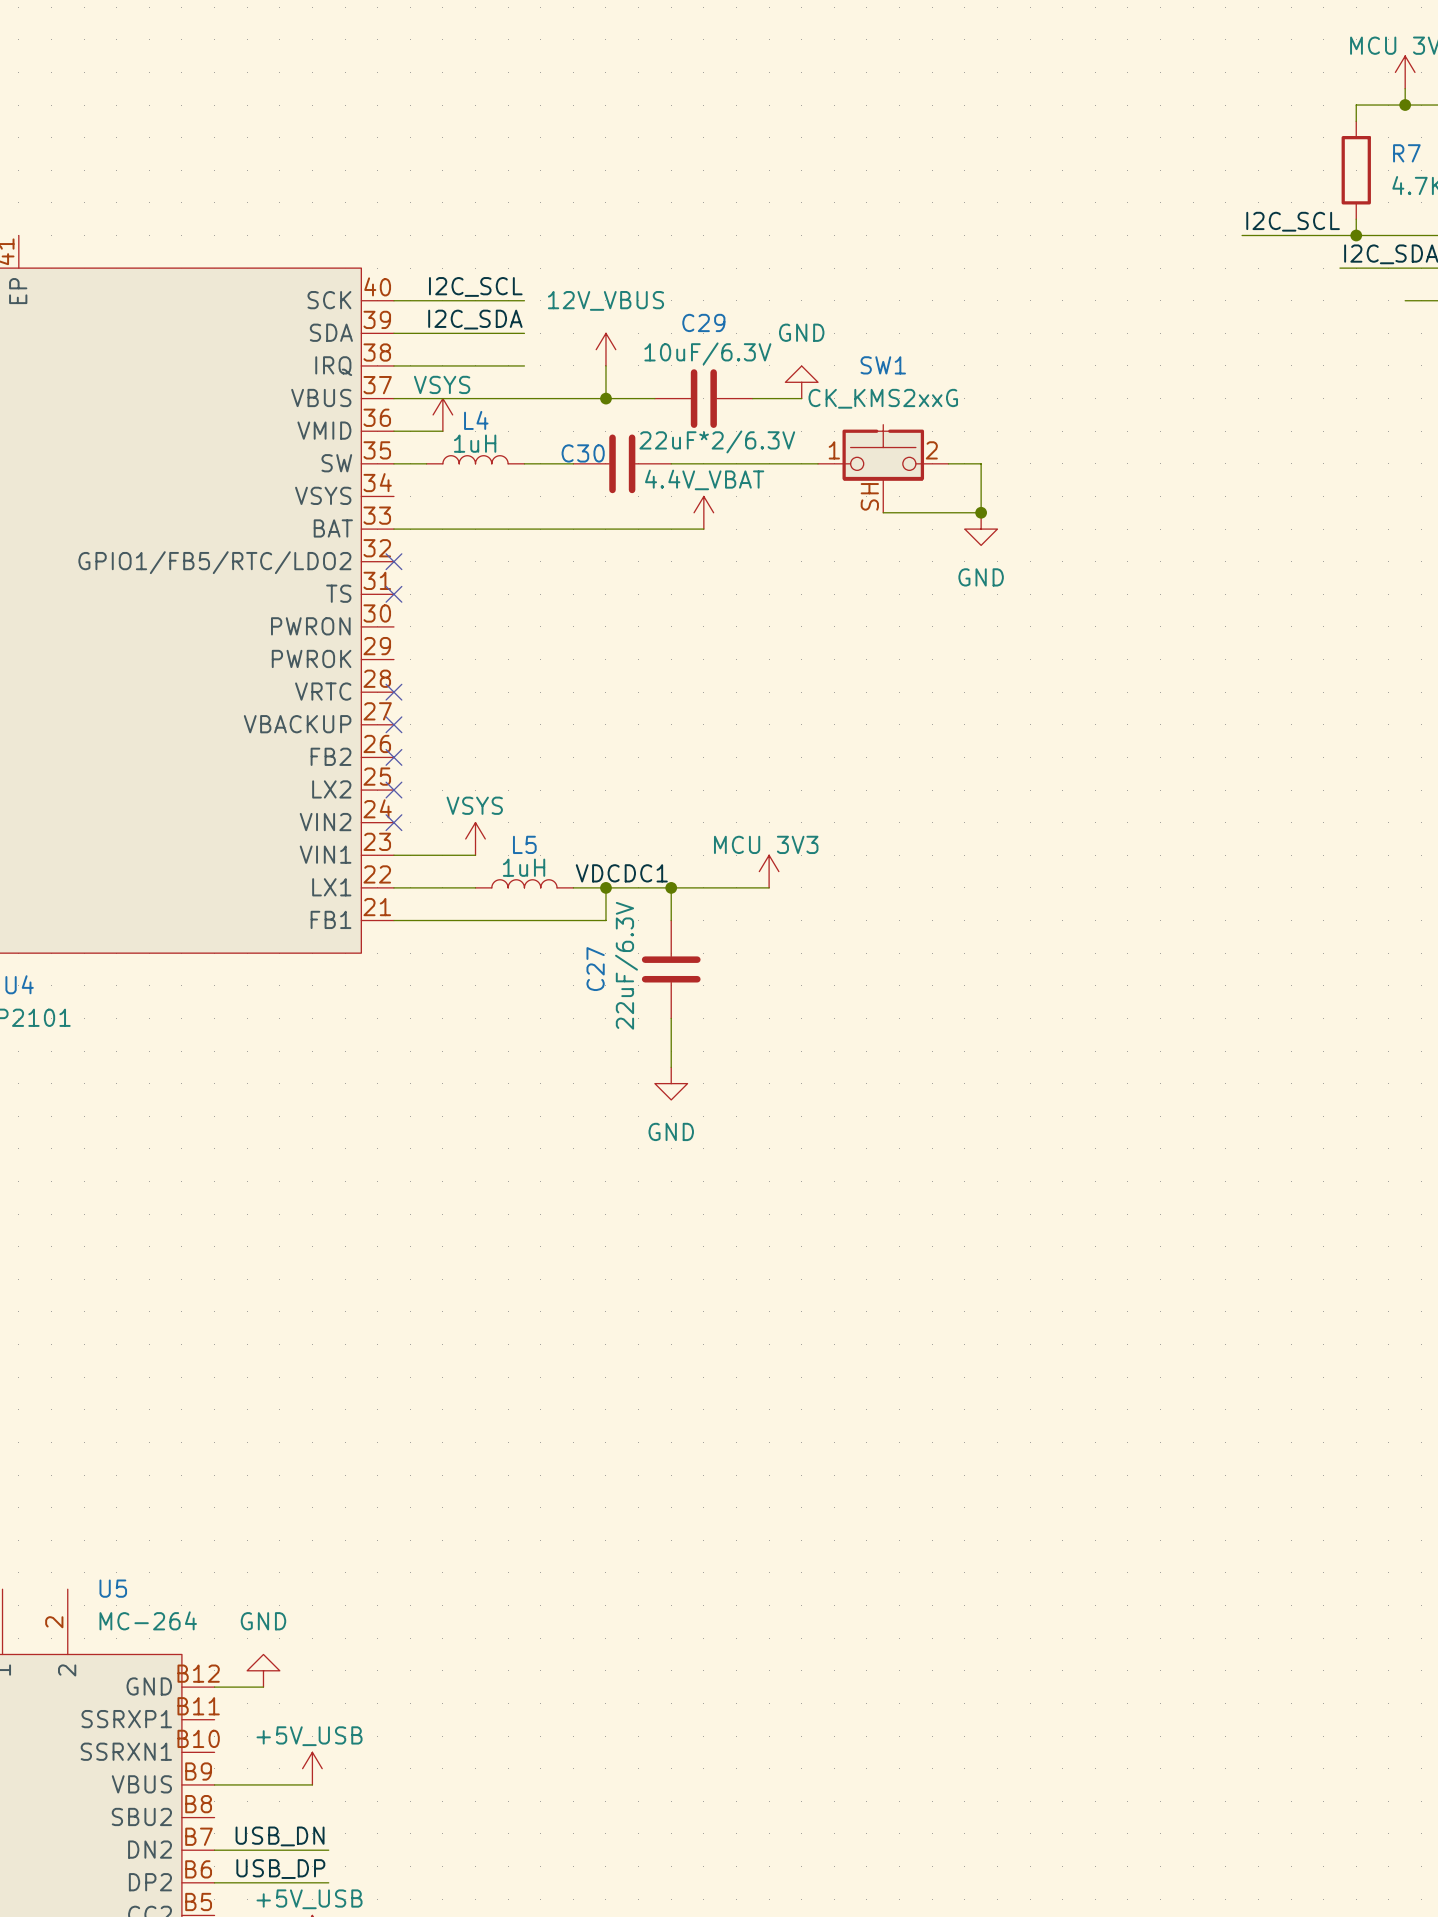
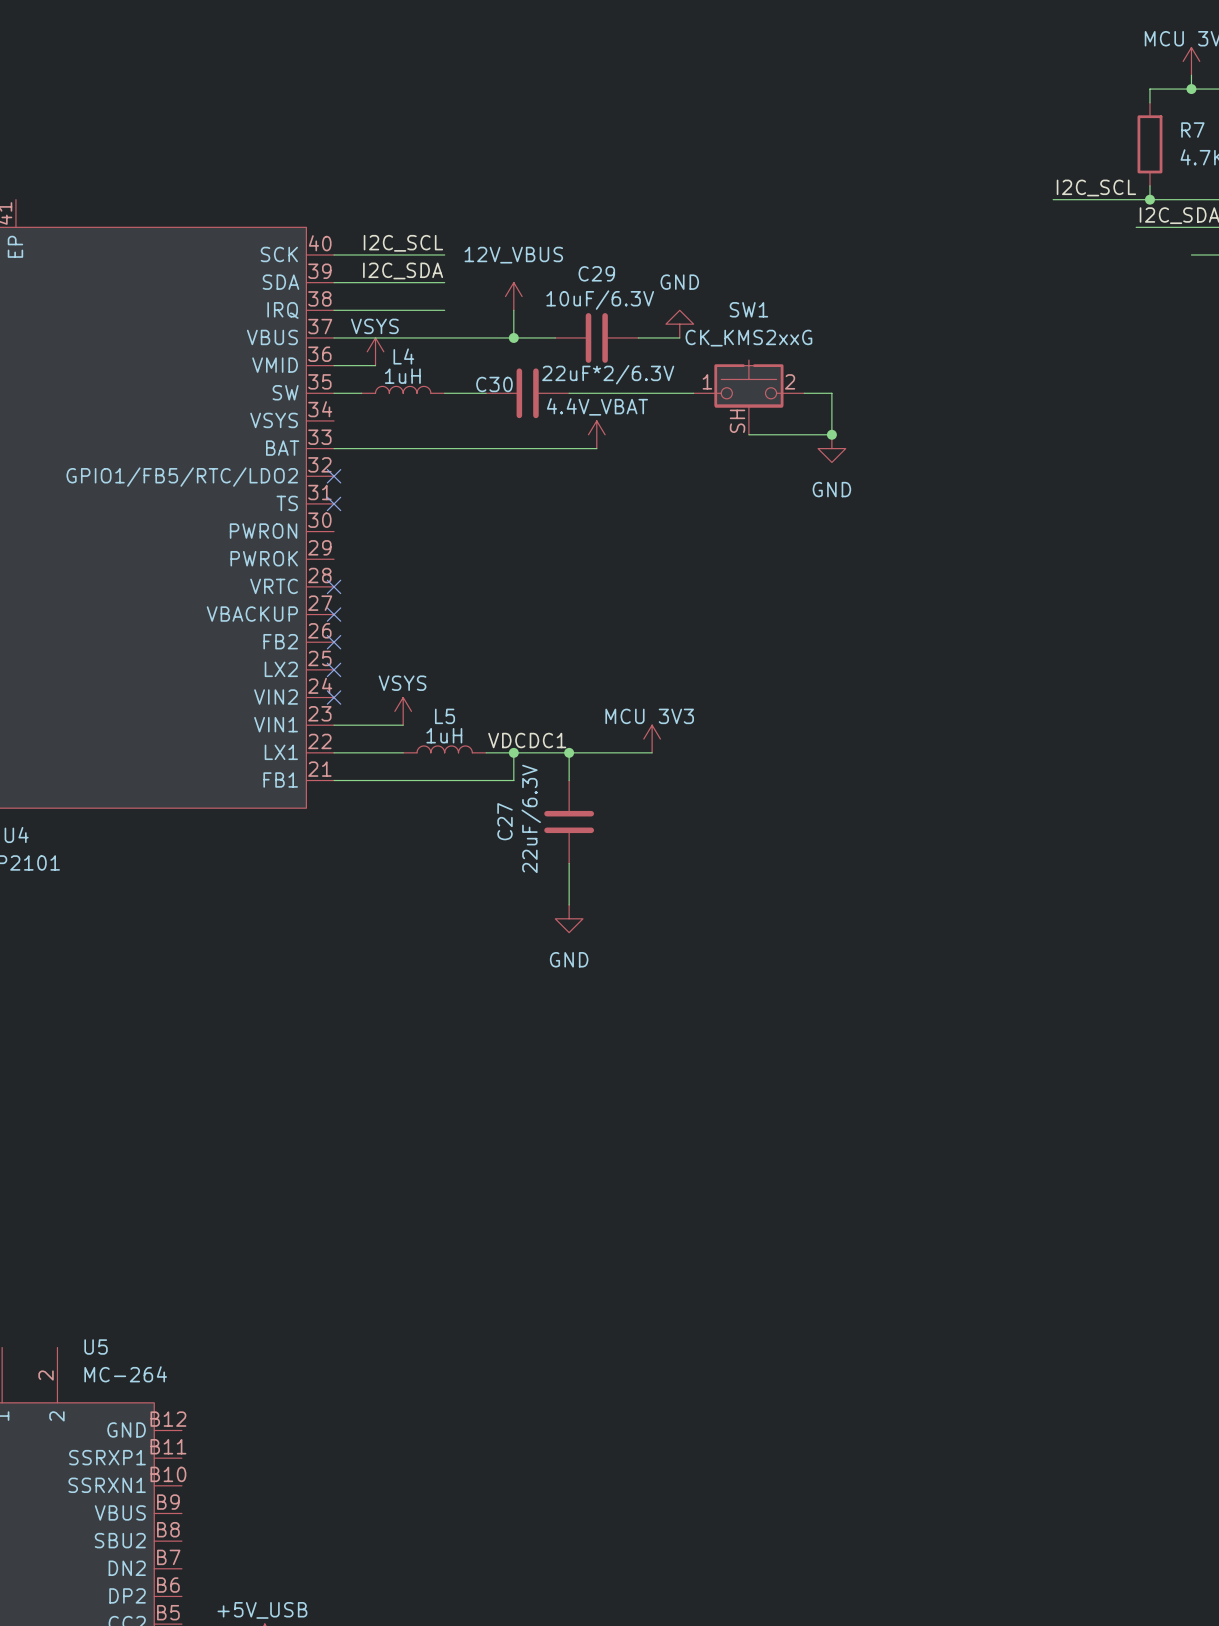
power symbol: GND (263, 1670) -> none
wire: (214, 1687) (263, 1687) -> none
power symbol: +5V_USB (312, 1768) -> none
wire: (214, 1784) (312, 1784) -> none
label: USB_DN (280, 1836) -> none
wire: (214, 1850) (328, 1850) -> none
label: USB_DP (280, 1869) -> none
wire: (214, 1882) (328, 1882) -> none

